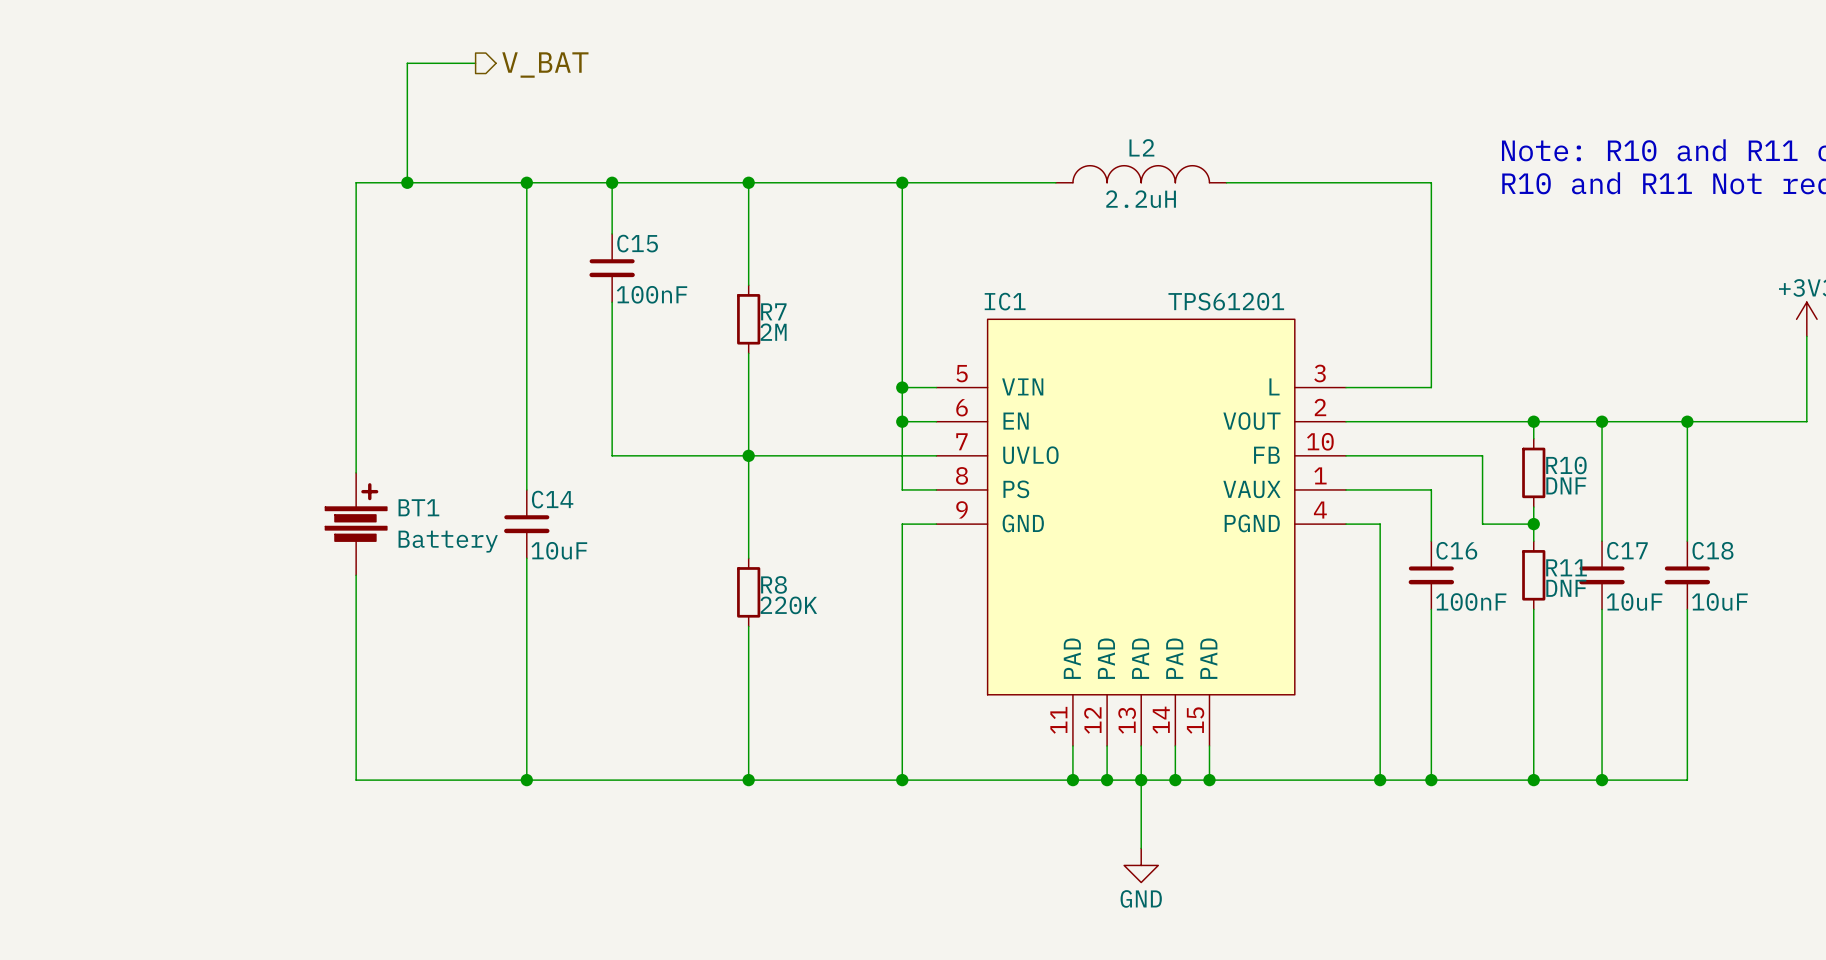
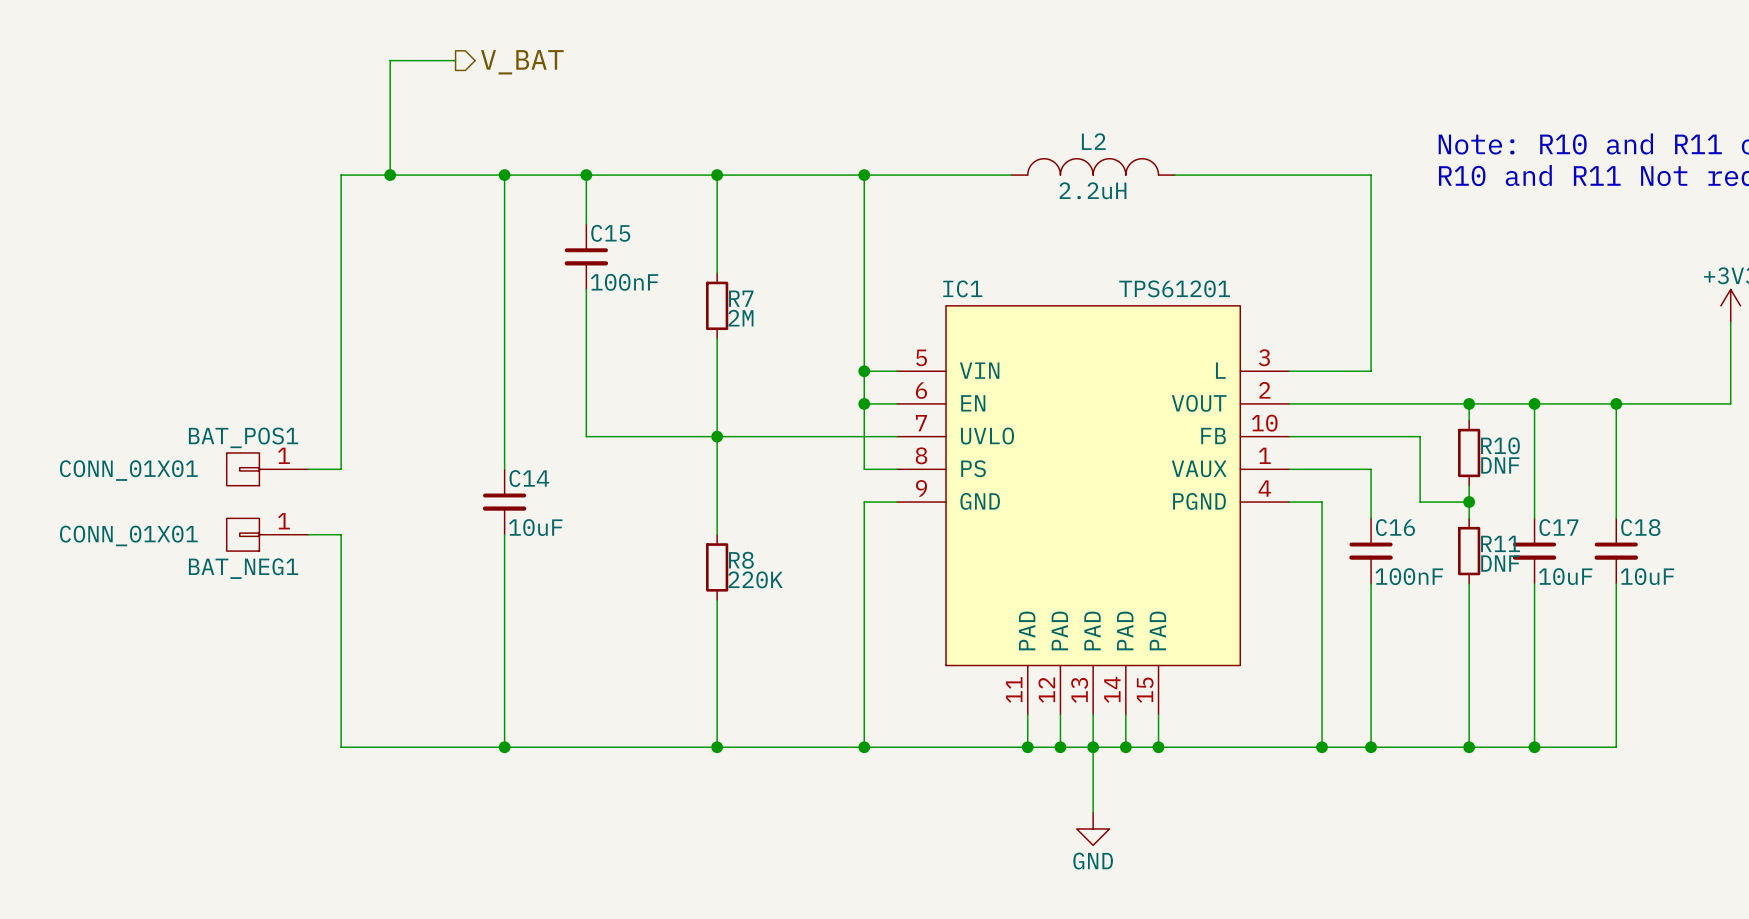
wire: none -> (341, 452) (341, 469) (308, 469)
BAT_POS1: none -> CONN_01X01 (267, 469)
BT1: Battery (356, 524) -> none
BAT_NEG1: none -> CONN_01X01 (267, 534)
wire: none -> (308, 534) (341, 534) (341, 551)

